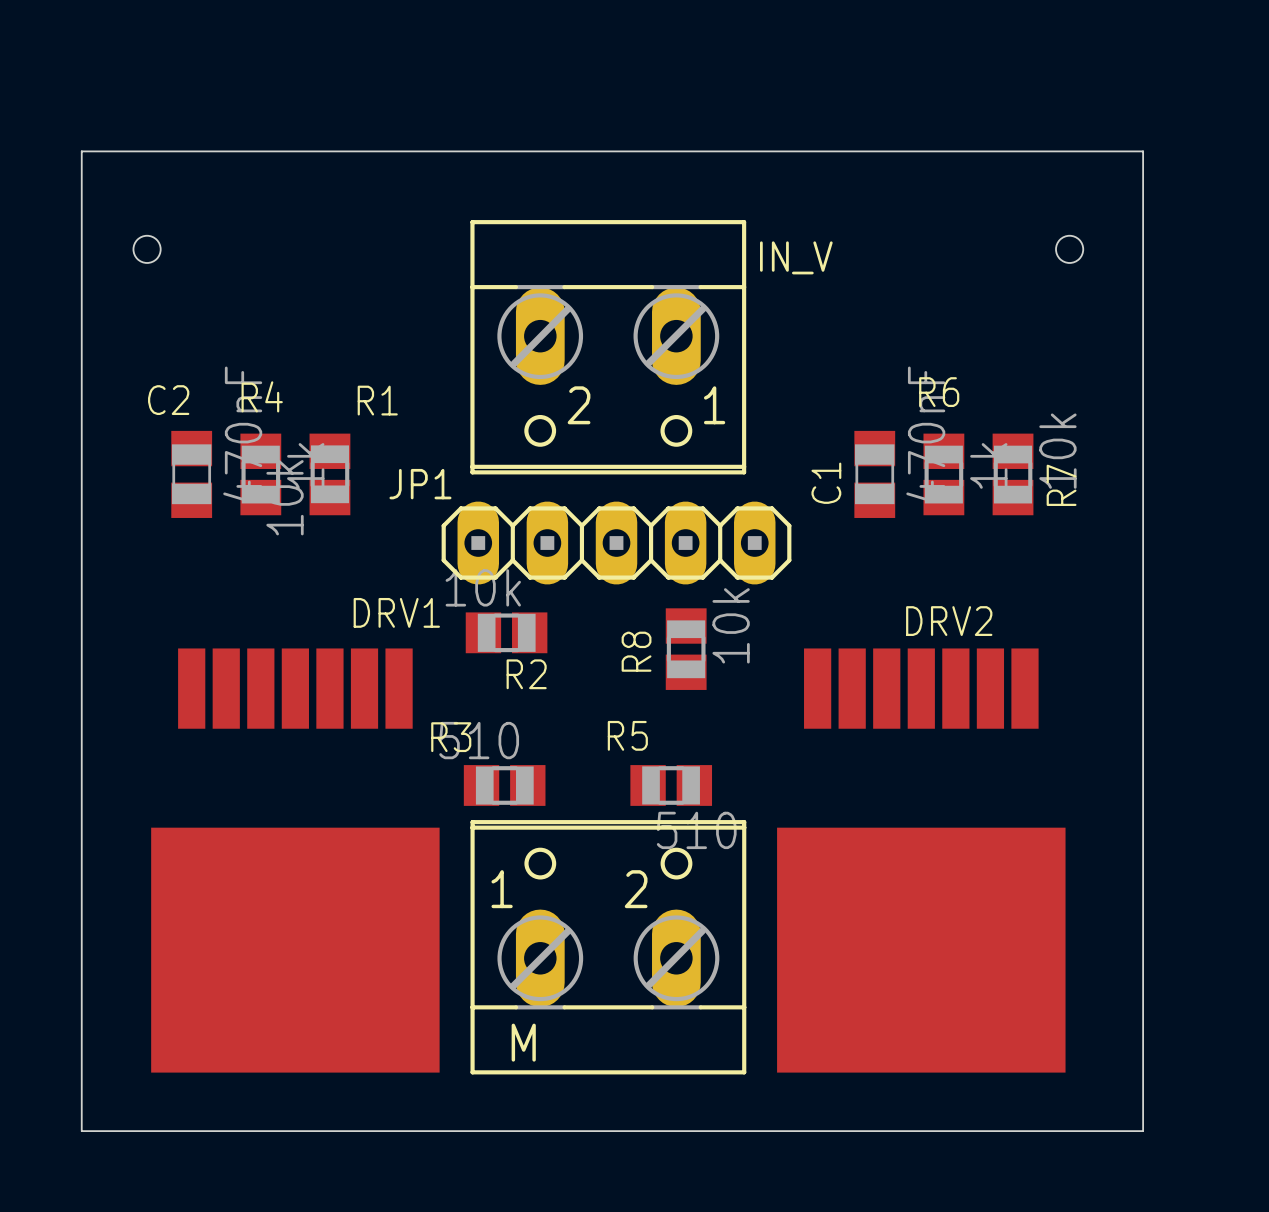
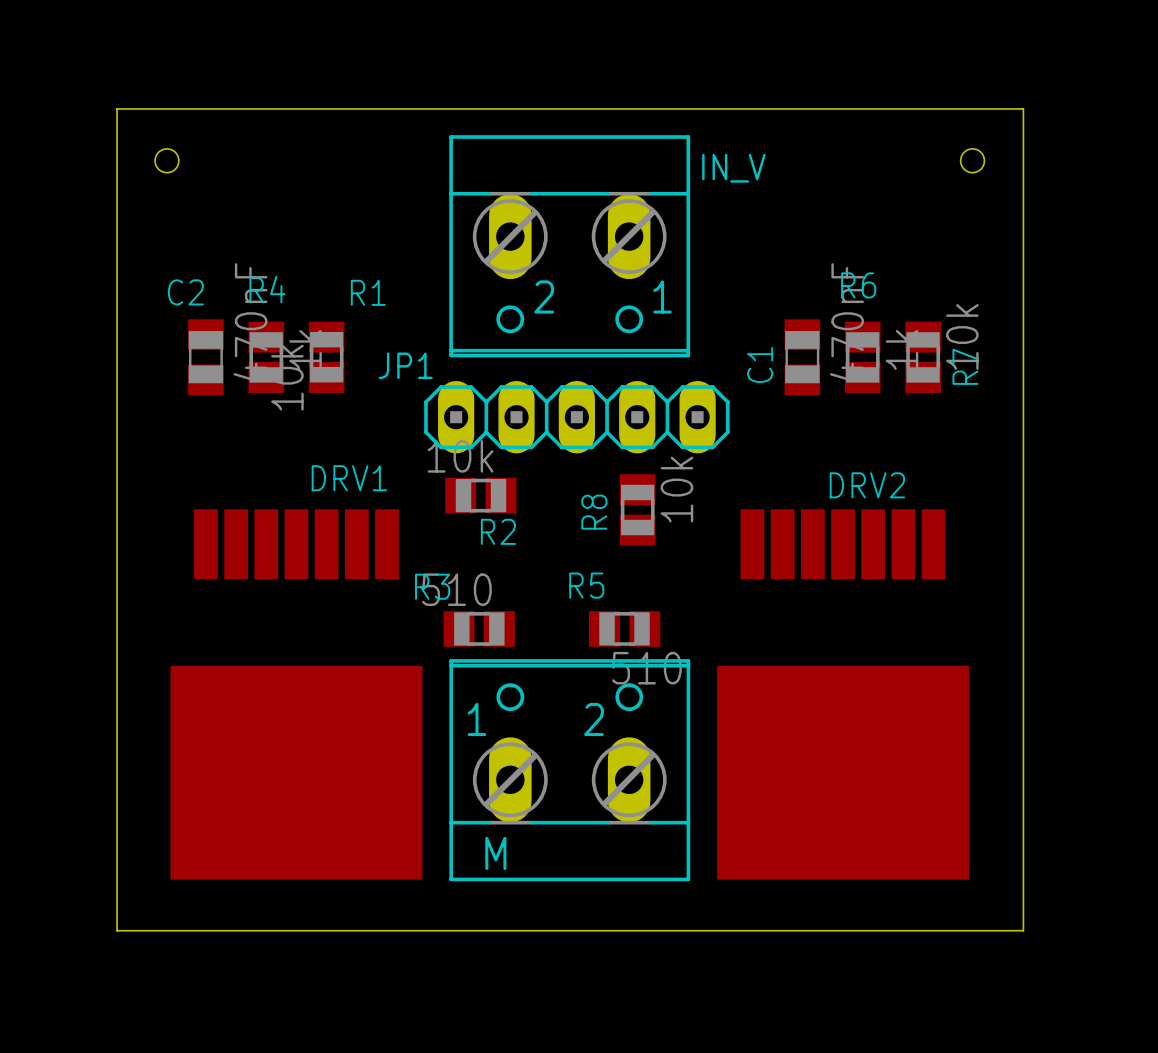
DRV1 name position: DRV1 (396, 612) -> DRV1 (349, 478)
board edge: (89, 1131) (81, 1131) (81, 151) (1143, 151) (1143, 1131) (1127, 1131) -> (117, 930) (117, 108) (1023, 108) (1023, 930)

